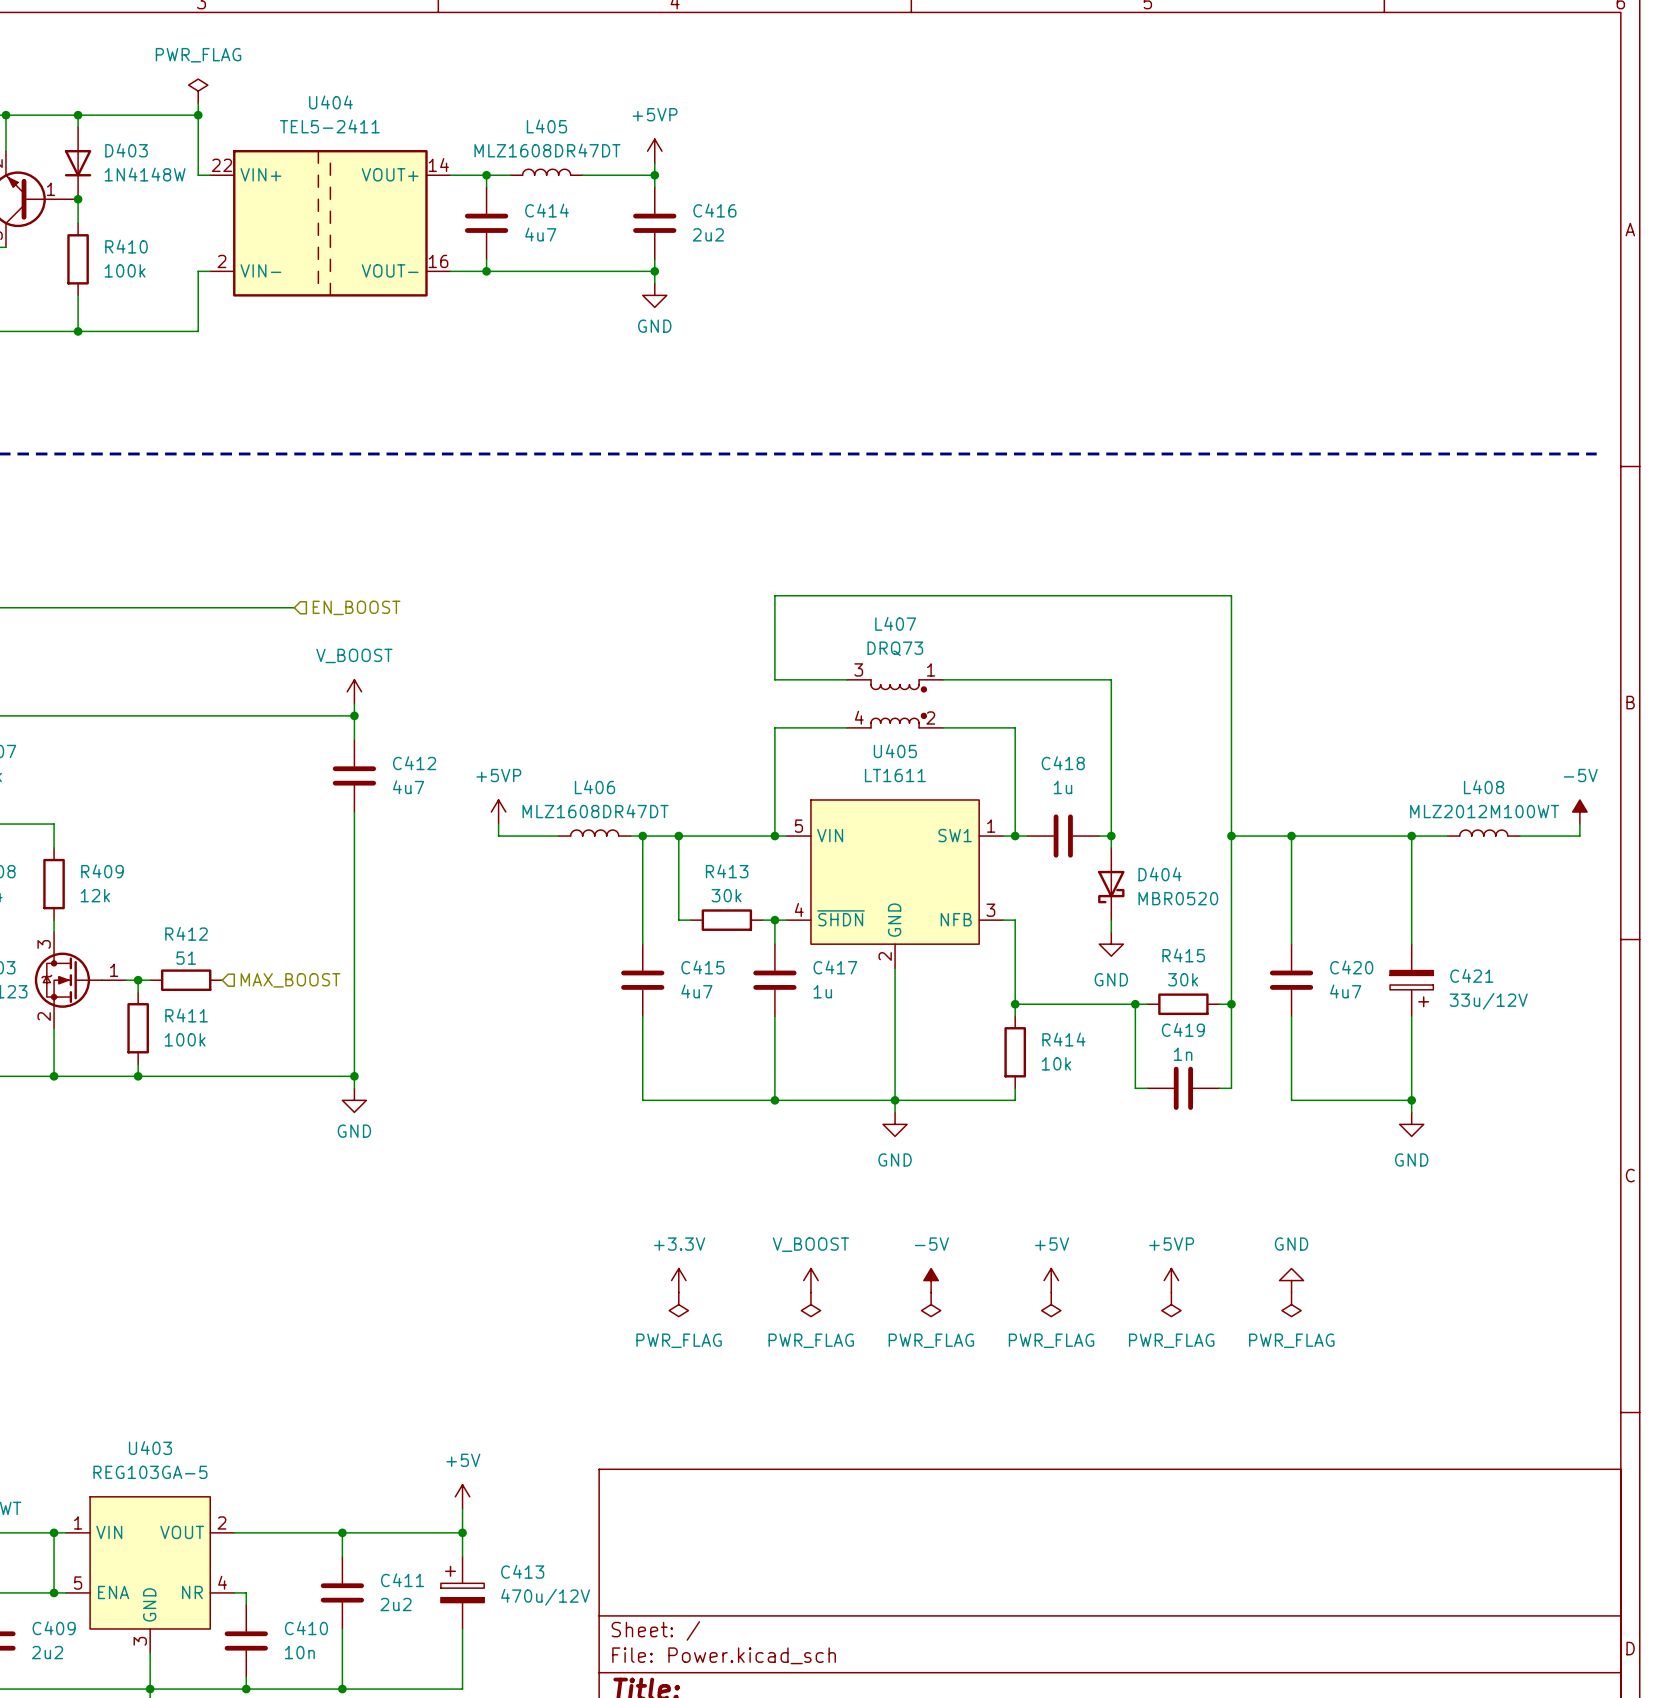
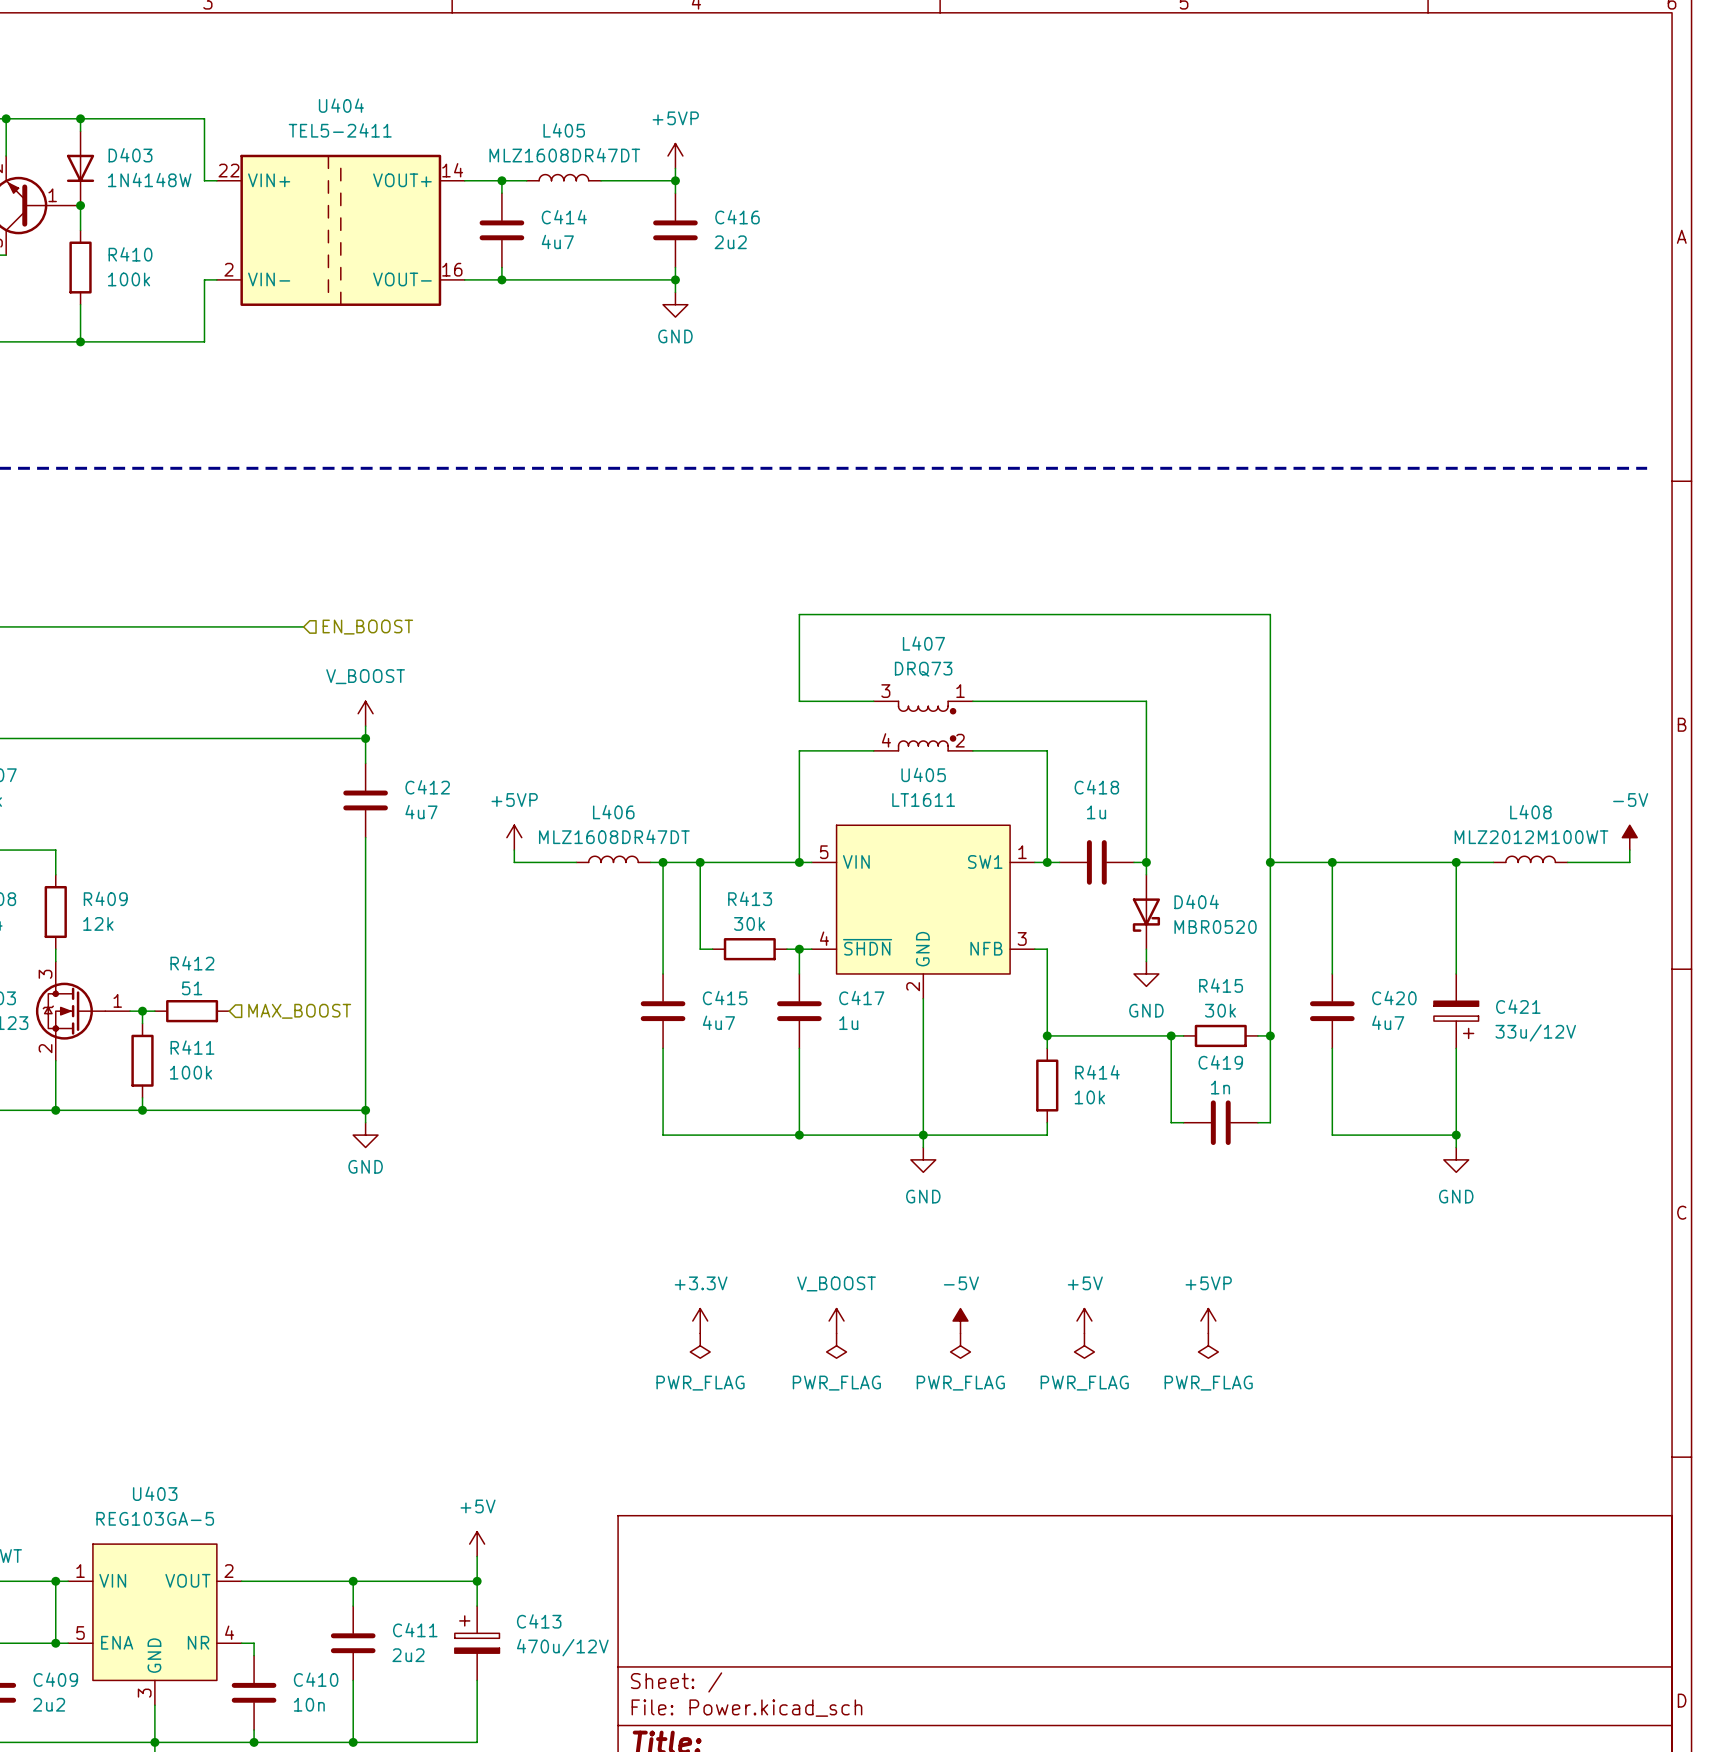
power symbol: PWR_FLAG (198, 91) -> none
wire: (198, 103) (198, 115) -> none
junction: (198, 115) -> none
power symbol: GND (1291, 1280) -> none
power symbol: PWR_FLAG (1291, 1304) -> none

